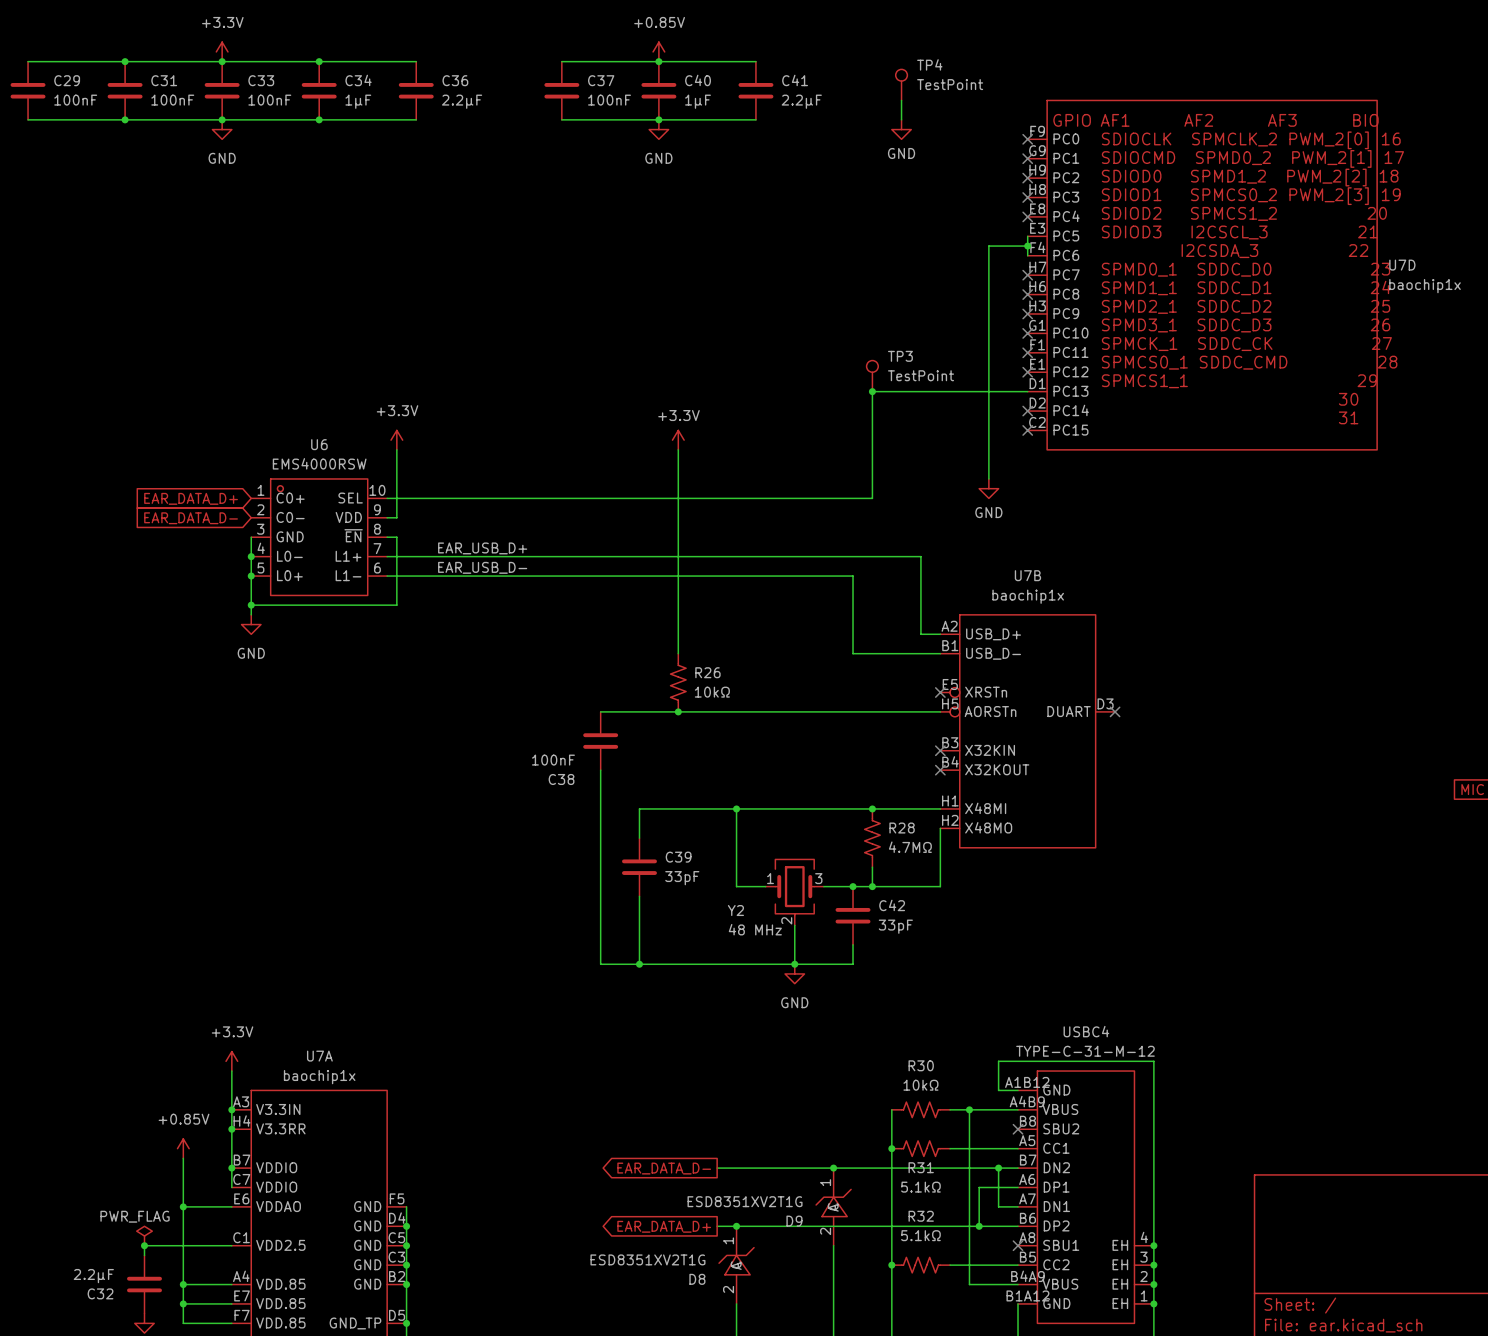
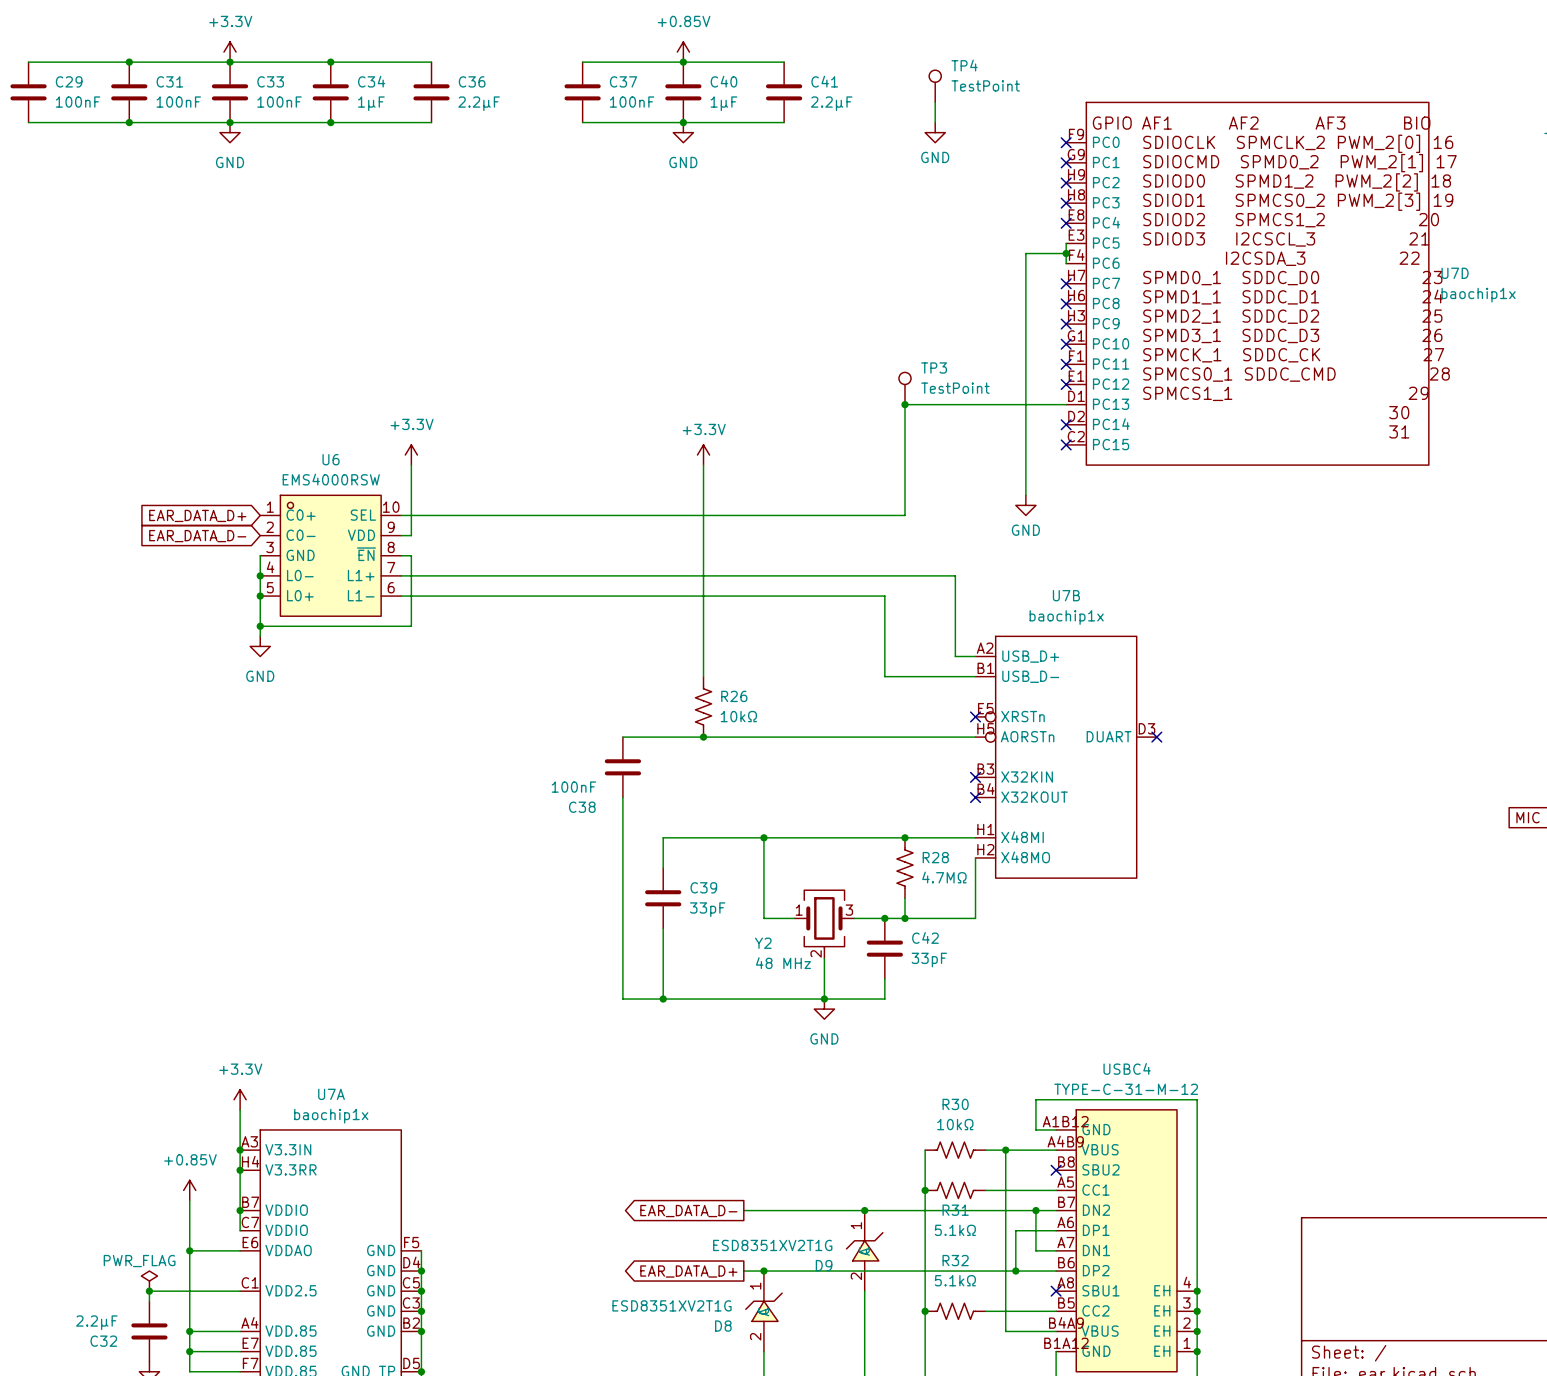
label: EAR_USB_D+ (482, 548) -> none
label: EAR_USB_D- (482, 567) -> none

